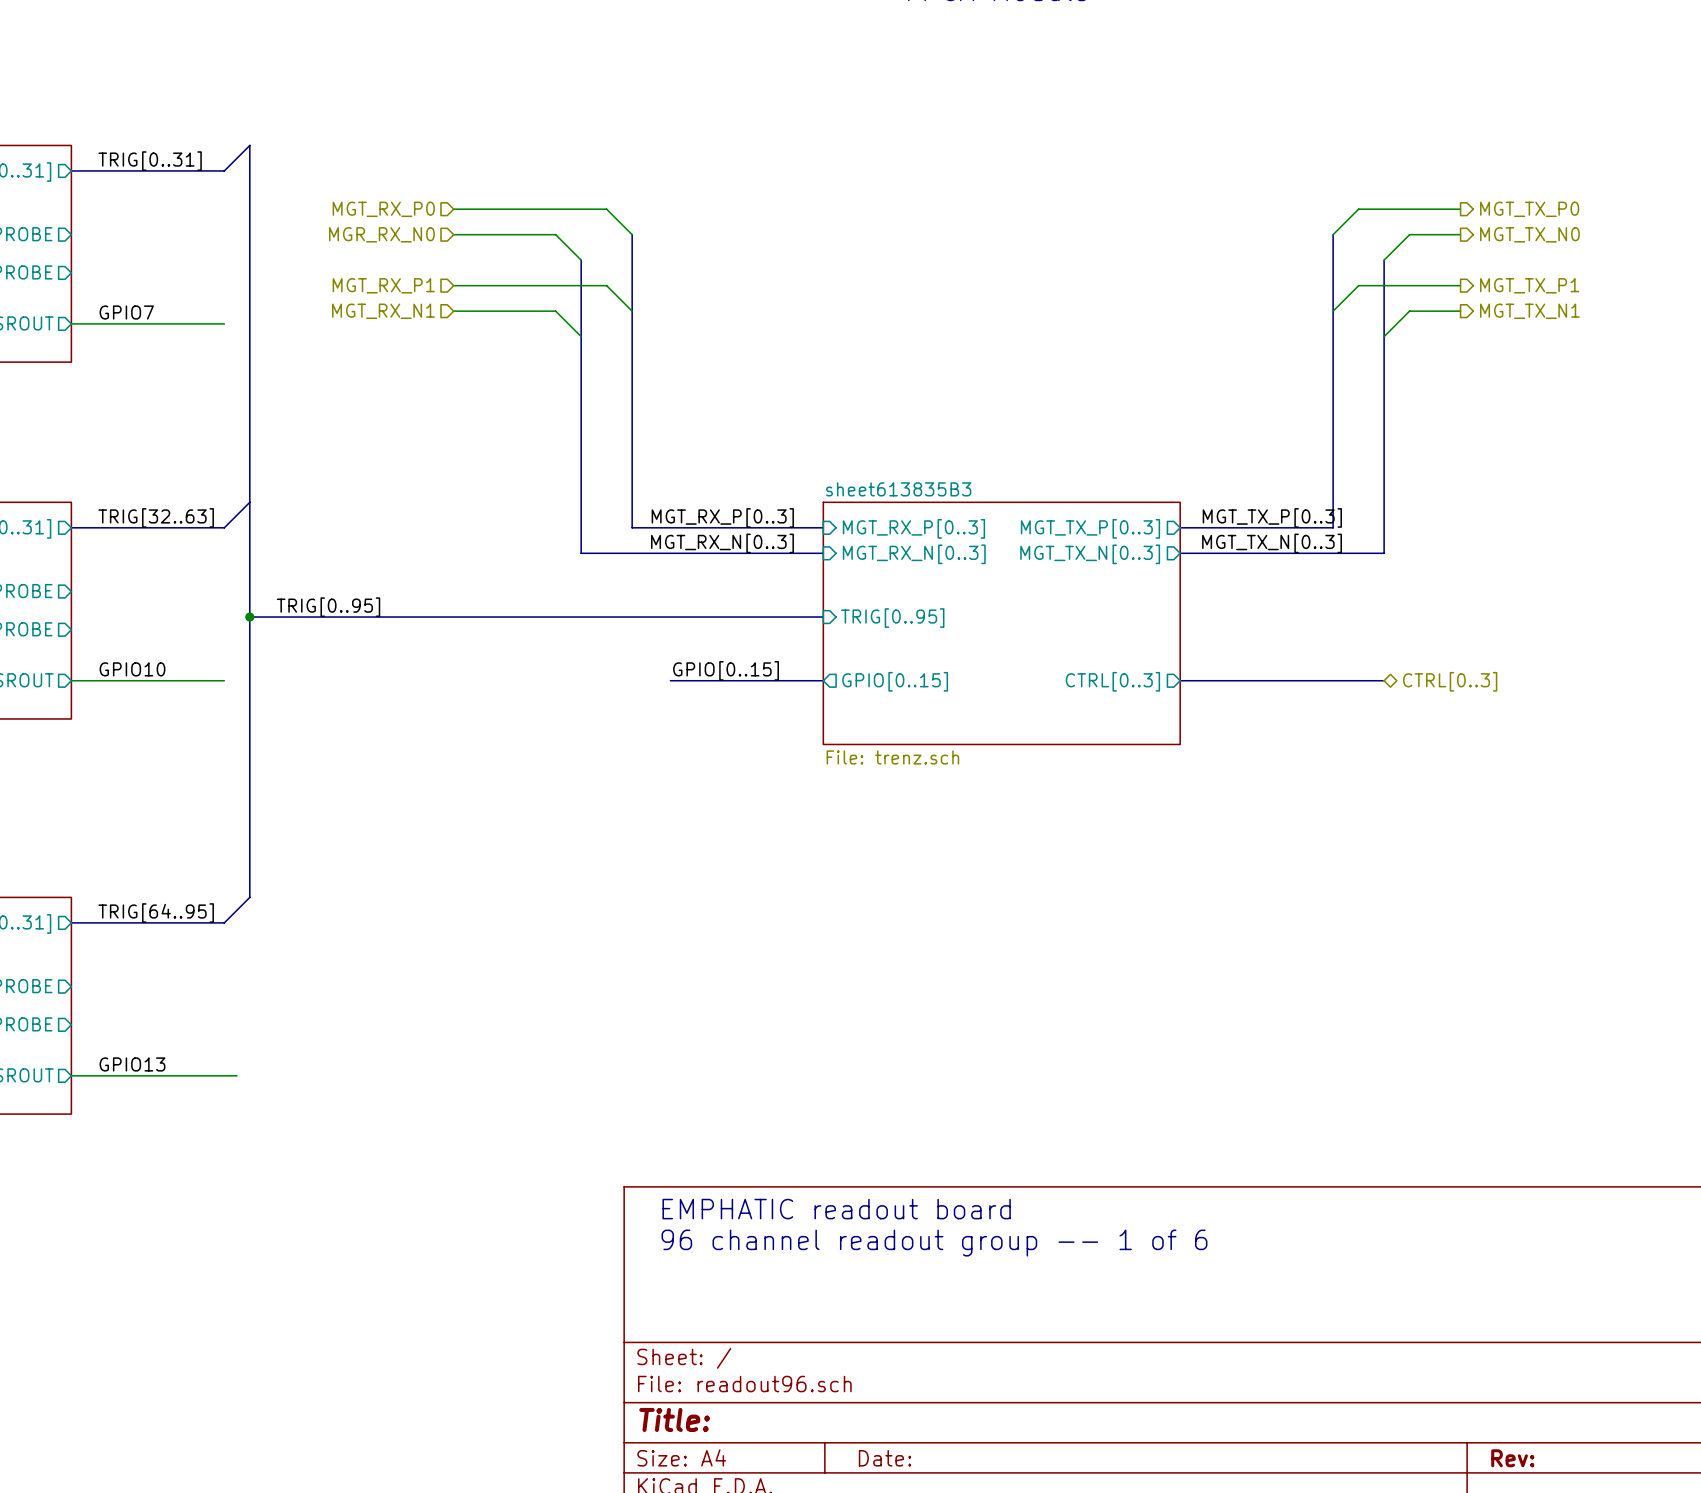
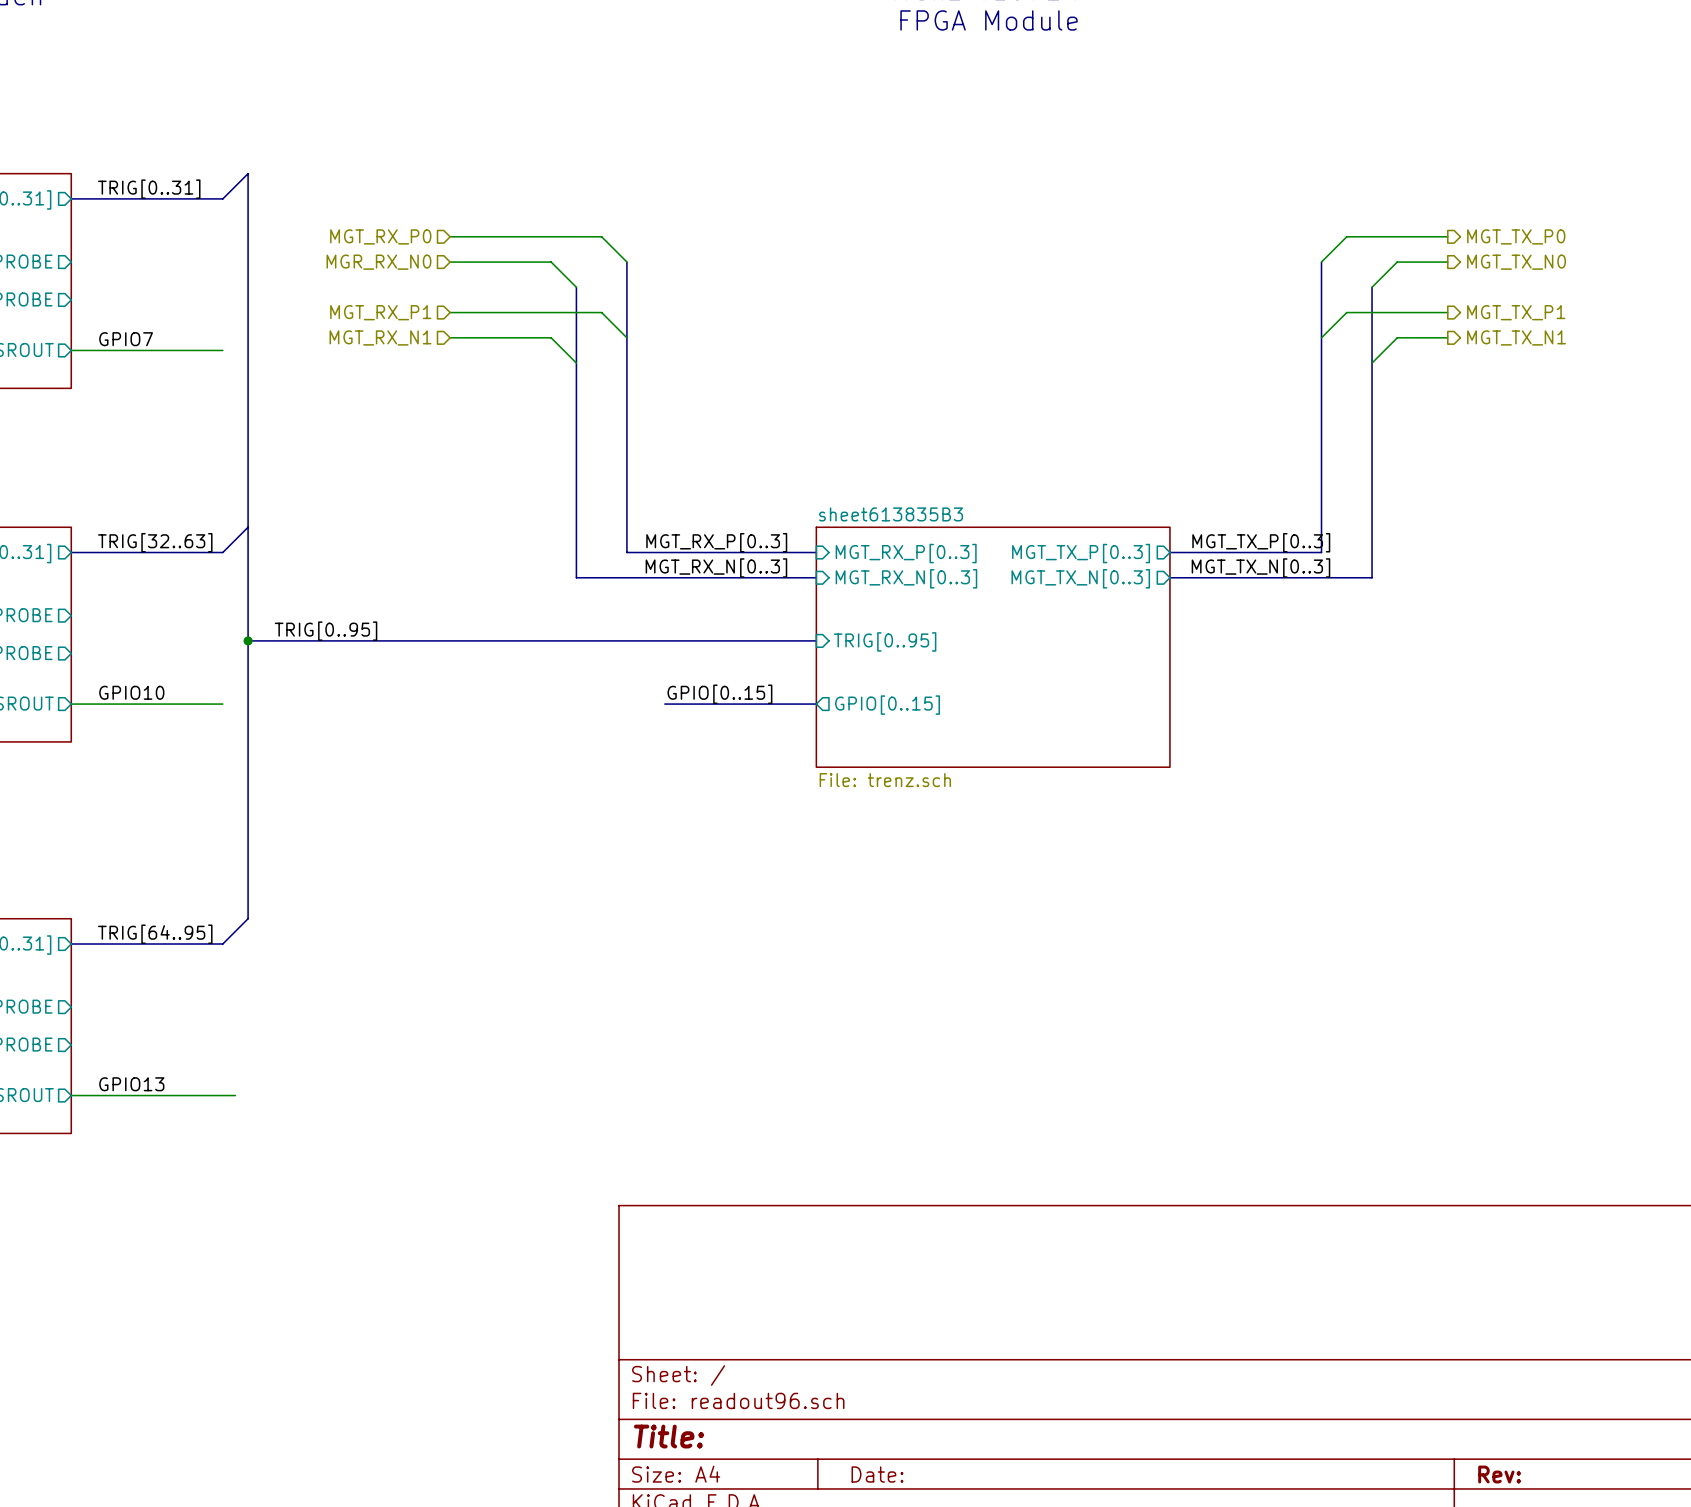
bus: (1180, 680) (1384, 680) -> none
sheet pin: CTRL[0..3] (1112, 681) -> none
hierarchical label: CTRL[0..3] (1450, 681) -> none
text: EMPHATIC readout board (836, 1209) -> none
text: 96 channel readout group -- 1 of 6 (934, 1243) -> none

